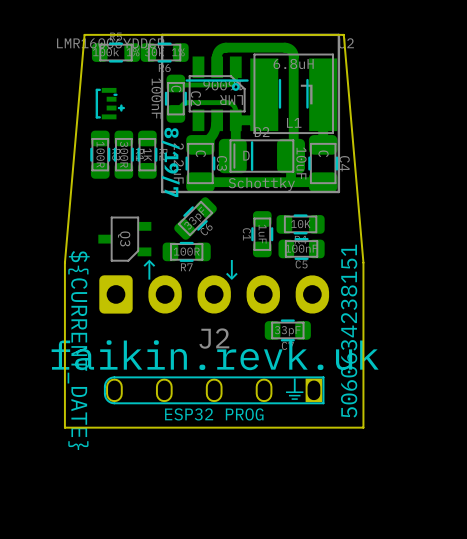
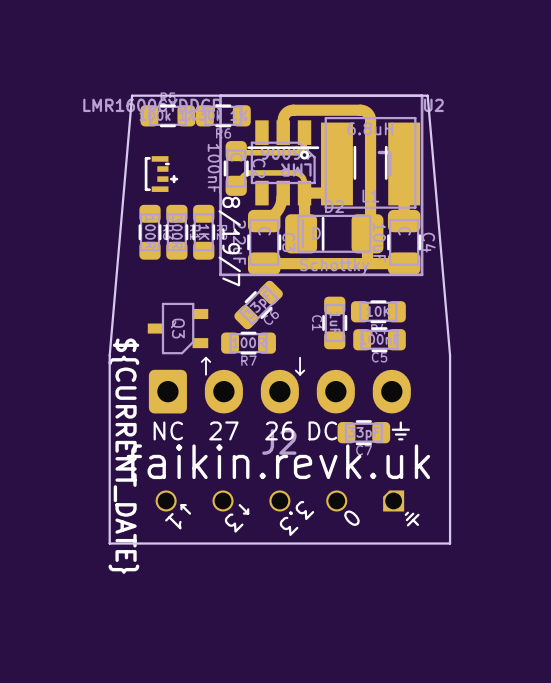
text: none -> NC (168, 430)
text: none -> 27 (223, 430)
text: none -> 26 (279, 430)
text: none -> DC (322, 430)
text: none -> ⏚ (400, 430)
text: 5060634238151 (349, 331) -> none
J2 footprint: [103, 376, 325, 405] -> [155, 490, 405, 512]
text: ESP32 PROG (214, 414) -> none

